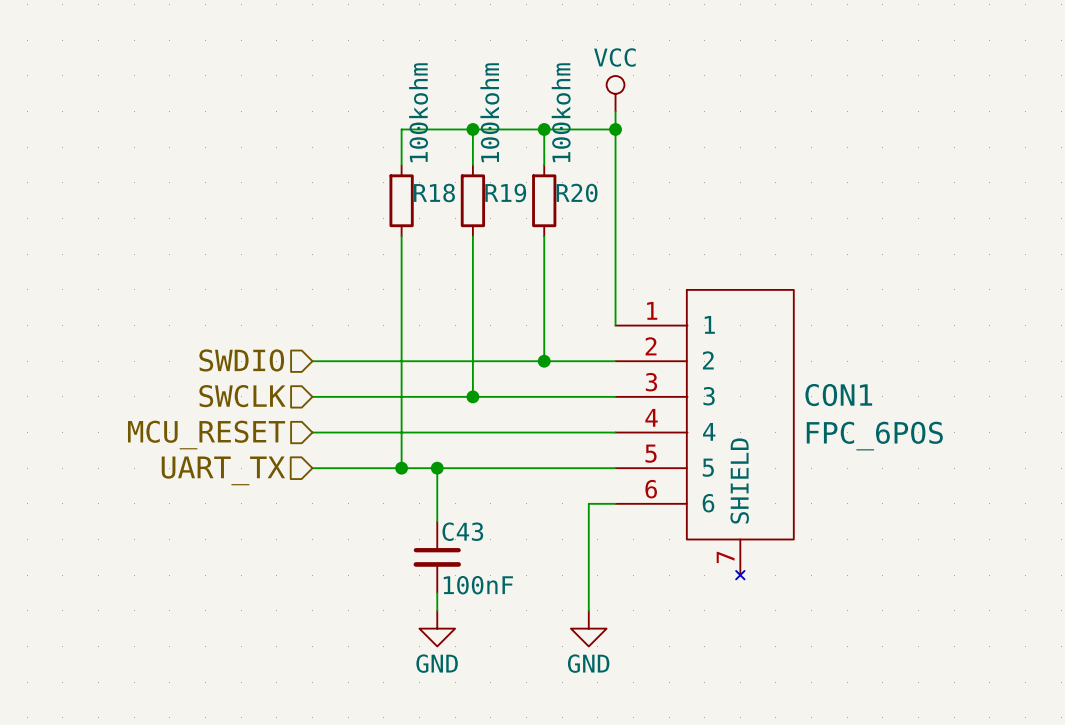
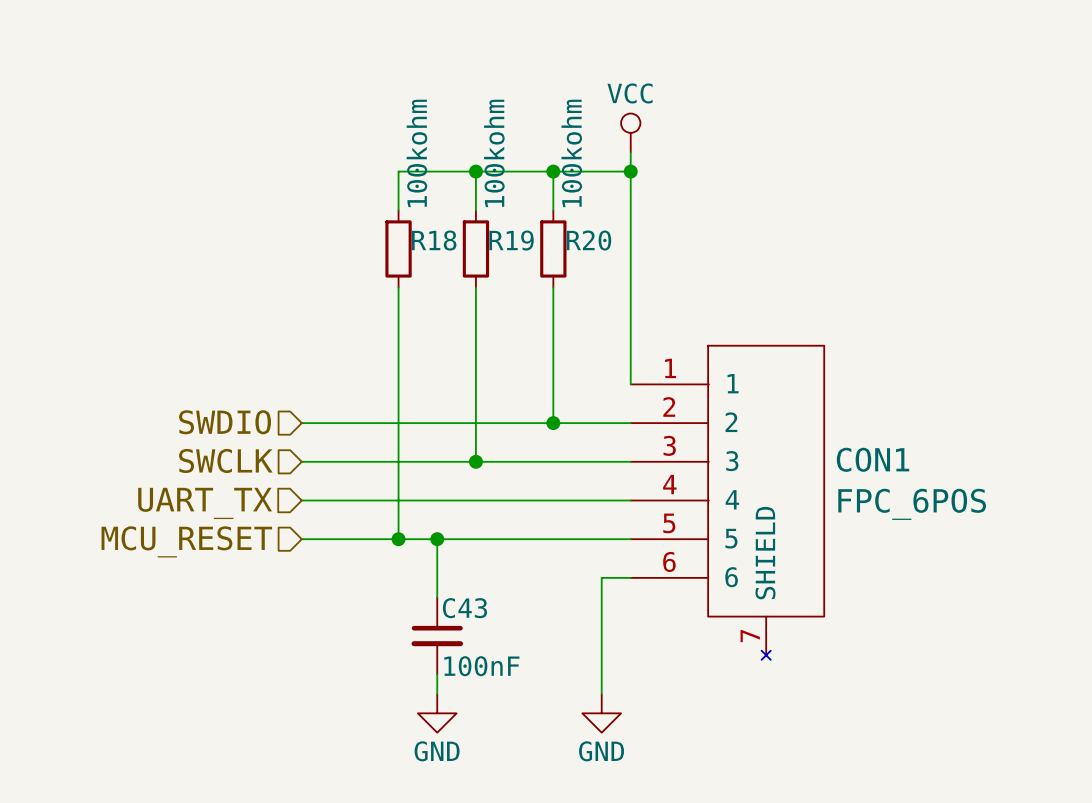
hierarchical label: MCU_RESET (206, 435) -> UART_TX (205, 503)
hierarchical label: UART_TX (223, 470) -> MCU_RESET (186, 541)

